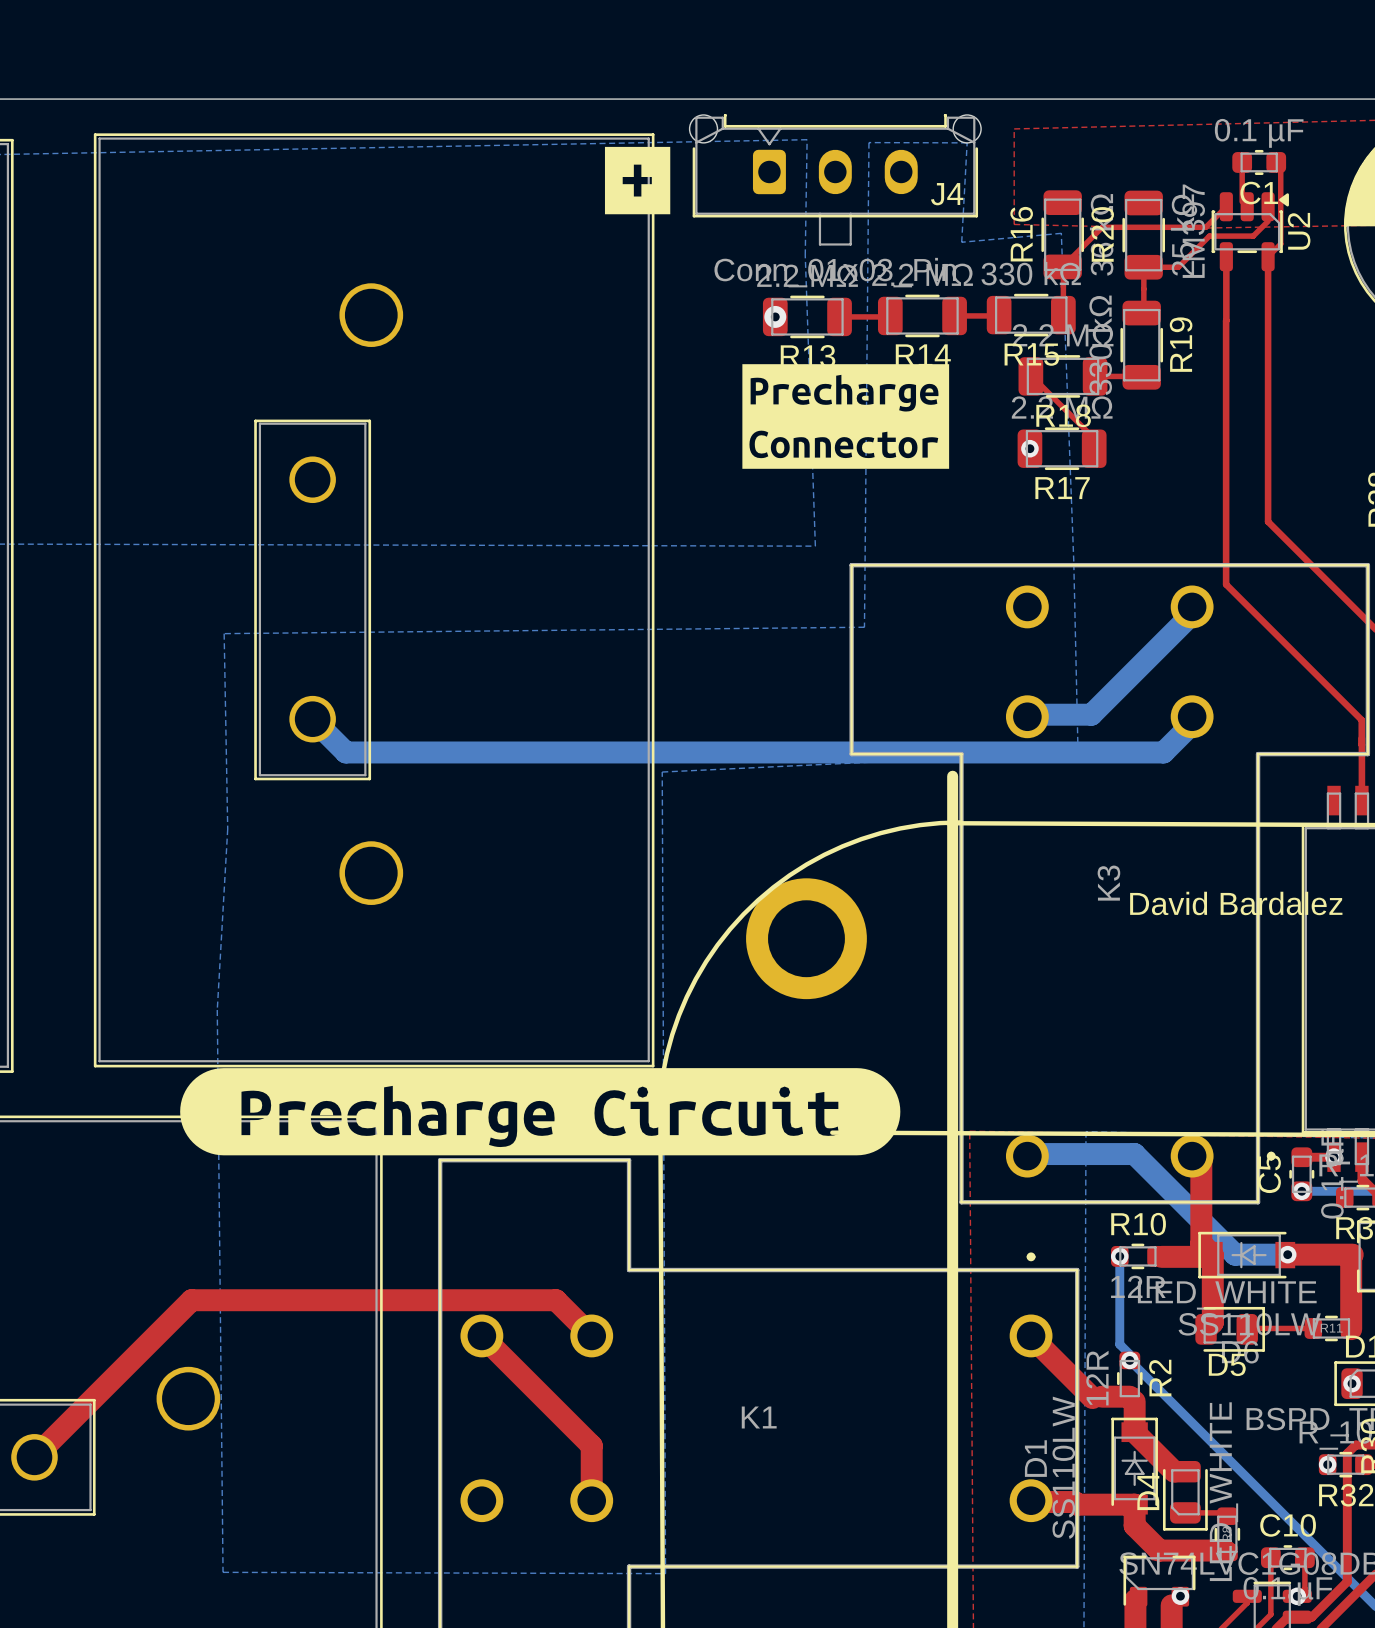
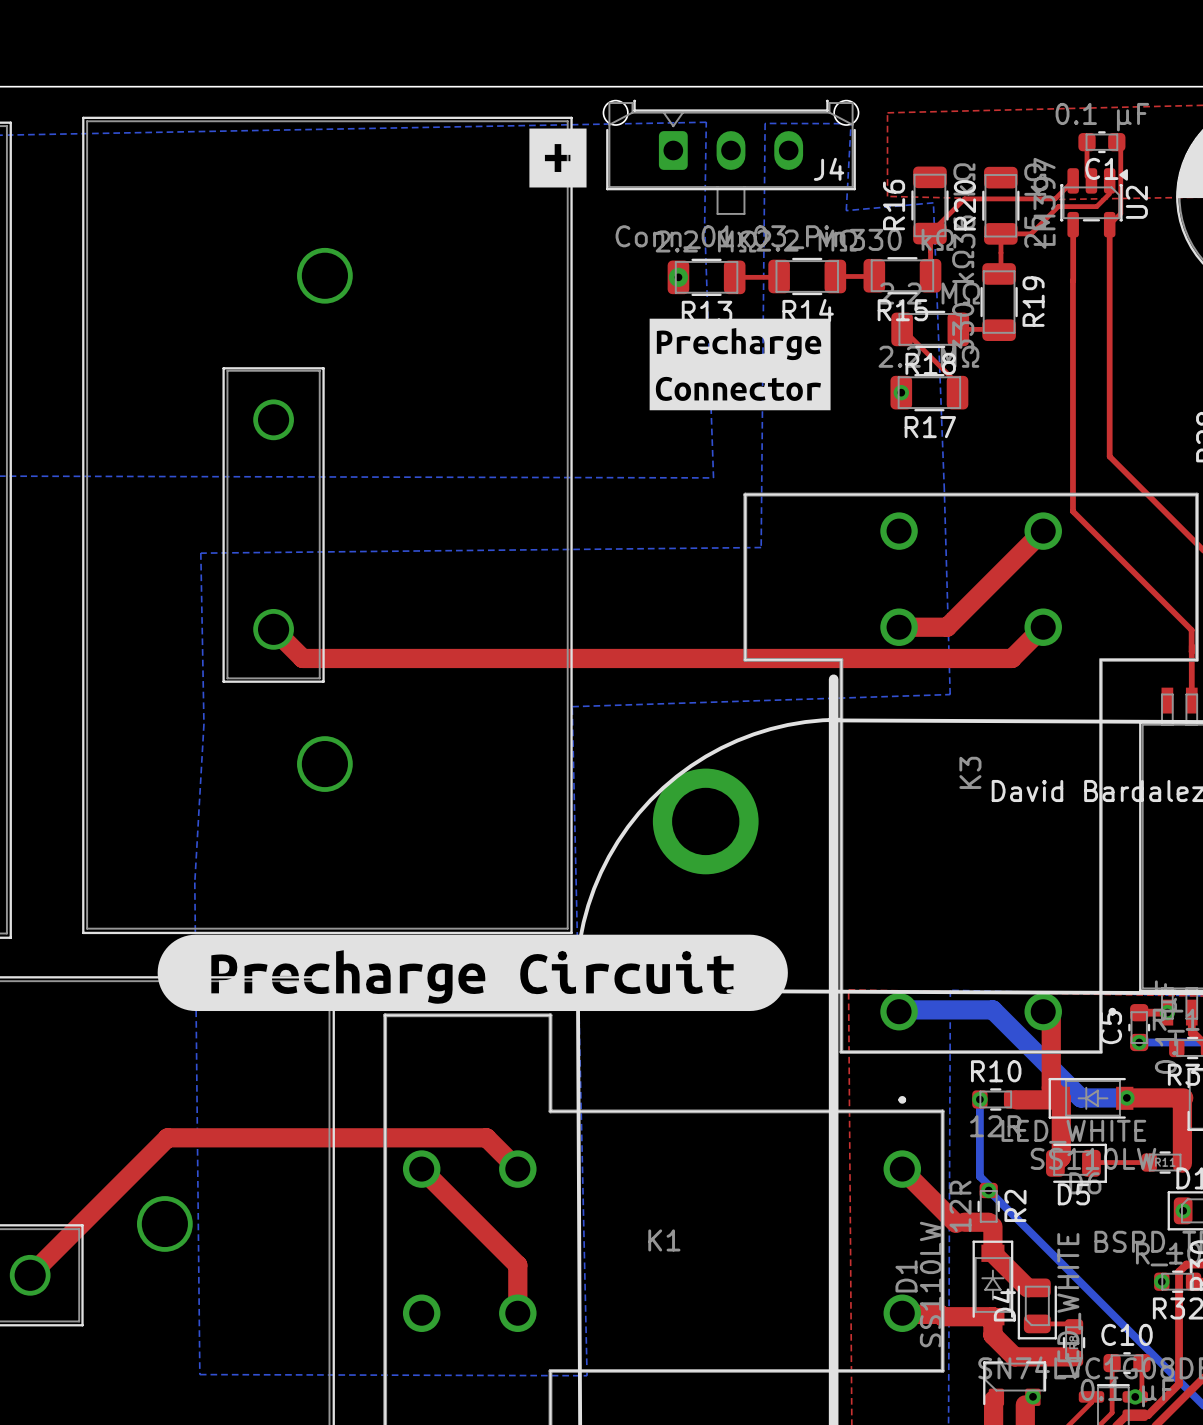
bottom zone outline: (868, 142) (864, 627) (224, 633) (227, 829) (217, 1010) (223, 1572) (665, 1573) (662, 772) (1078, 752) (1073, 561) (1061, 233) (961, 242) (967, 142) (868, 142) -> (765, 123) (761, 547) (200, 553) (203, 724) (194, 882) (199, 1374) (587, 1375) (572, 706) (950, 694) (933, 202) (846, 210) (851, 123) (765, 123)
bottom track: (1201, 604) (1091, 714) (1036, 714) -> none
top track: none -> (1043, 531) (947, 627) (899, 627)
bottom track: (1201, 714) (1163, 752) (345, 752) (312, 719) -> none
top track: none -> (1043, 627) (1011, 658) (302, 658) (273, 629)

